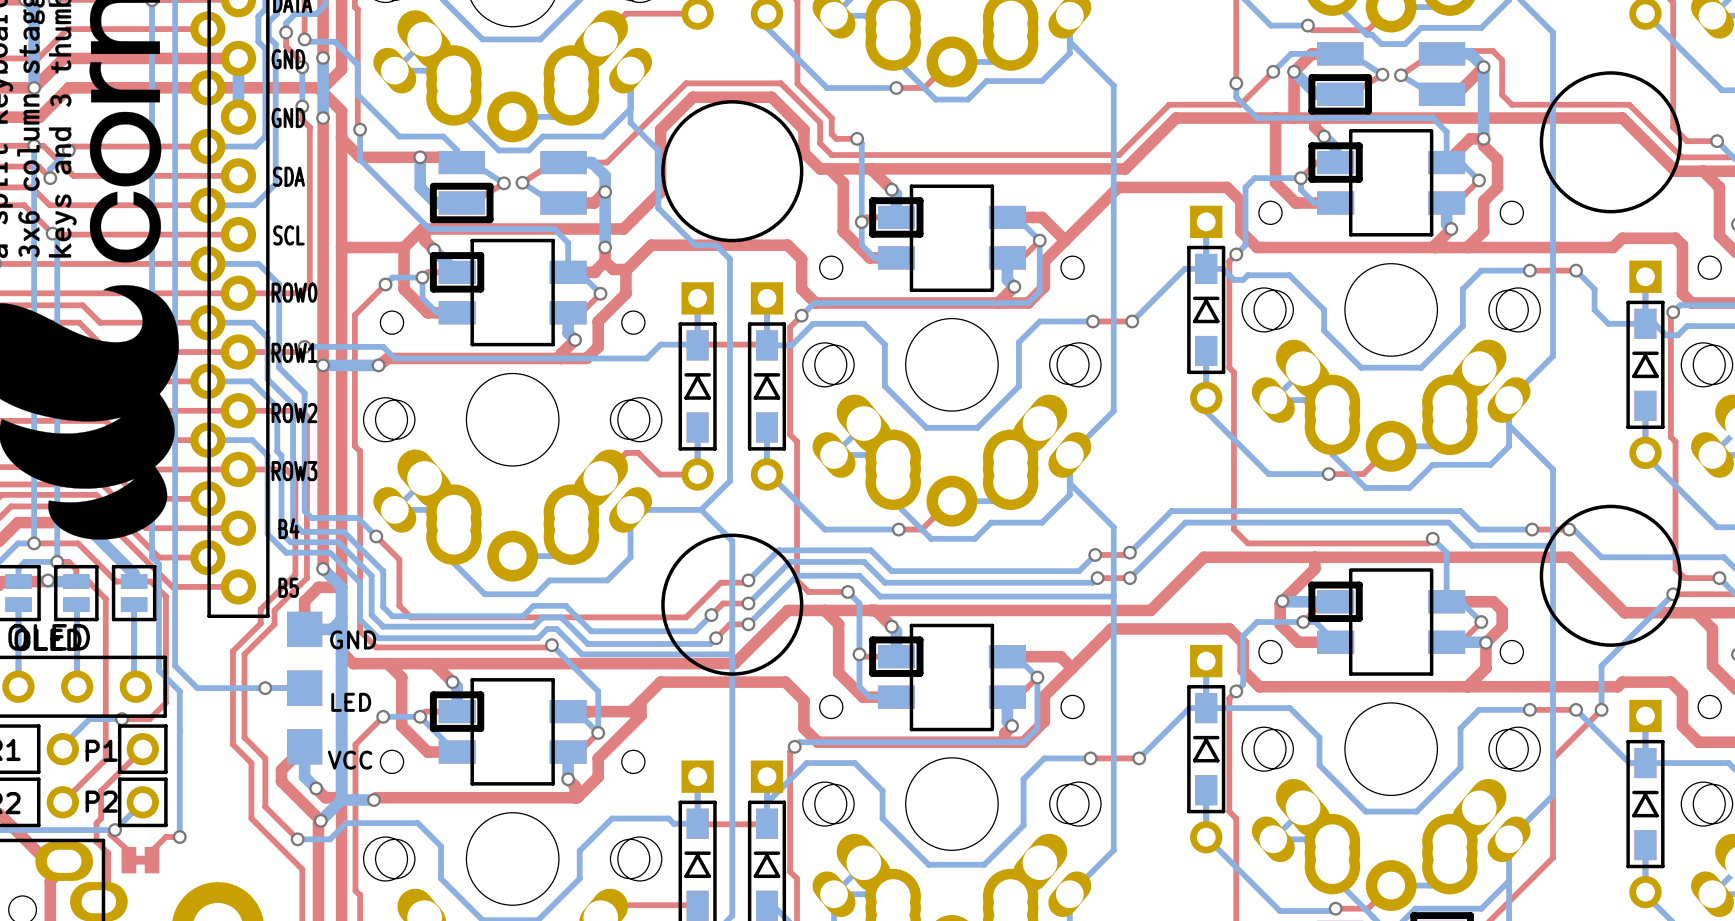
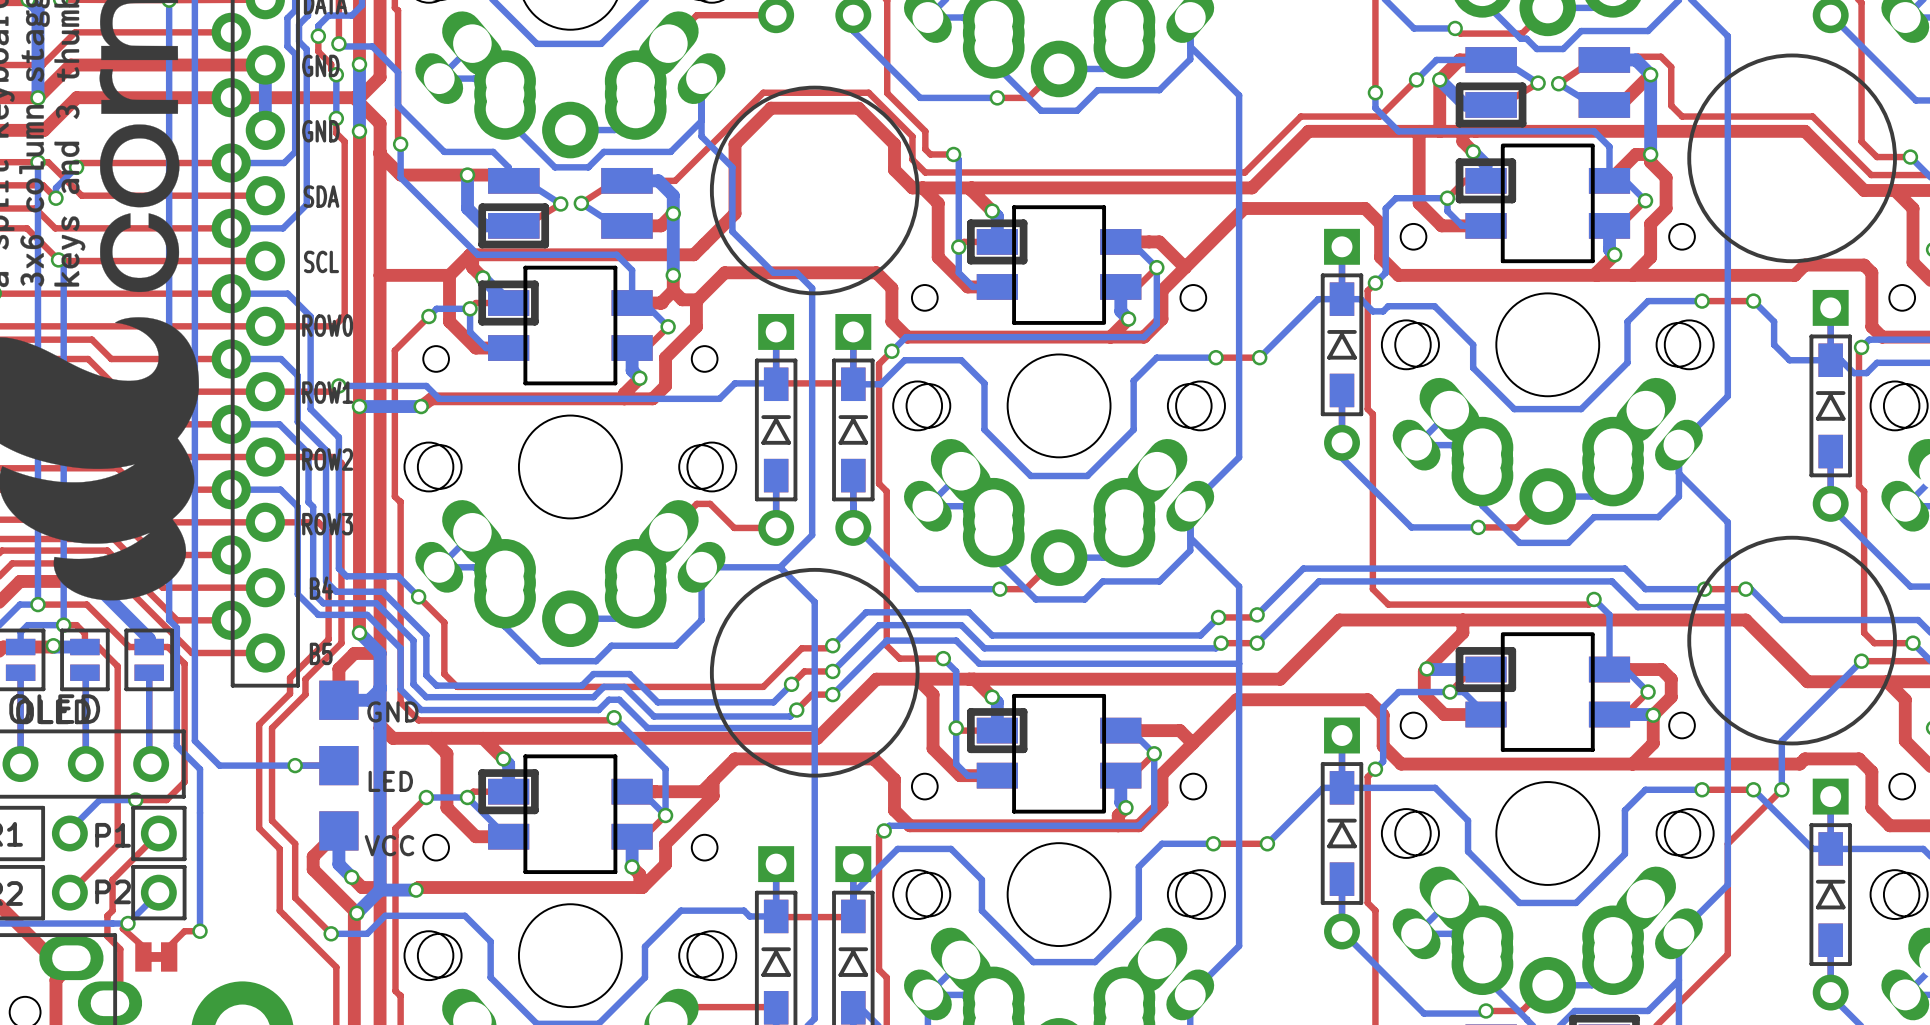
drawing shape: [1539, 71, 1682, 214] -> [1687, 53, 1897, 264]
drawing shape: [661, 100, 804, 243] -> [709, 85, 920, 296]
drawing shape: [1539, 504, 1682, 647] -> [1687, 535, 1897, 746]
drawing shape: [661, 533, 804, 676] -> [709, 567, 920, 778]

